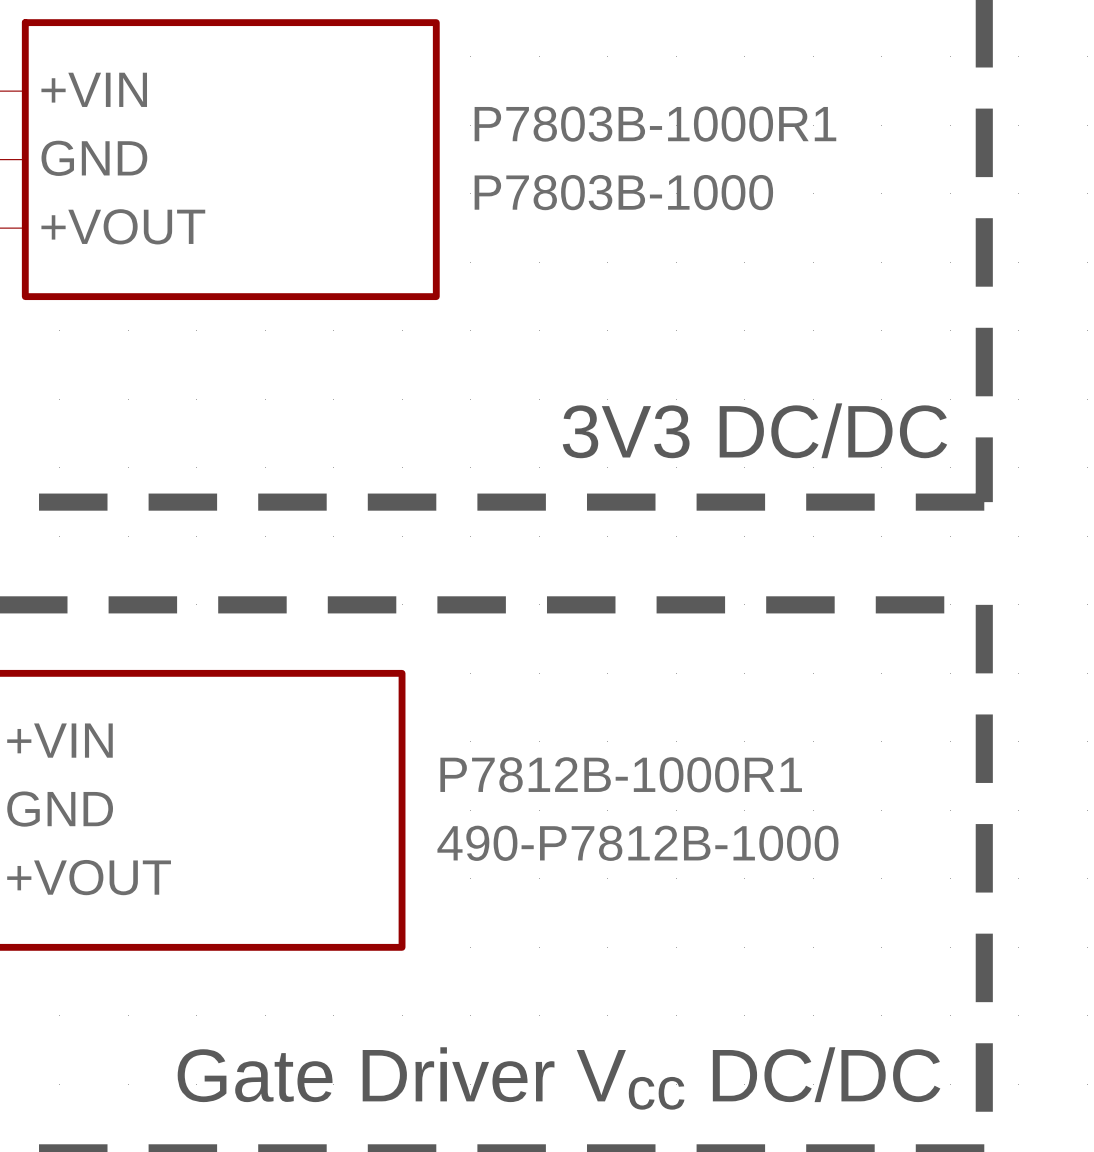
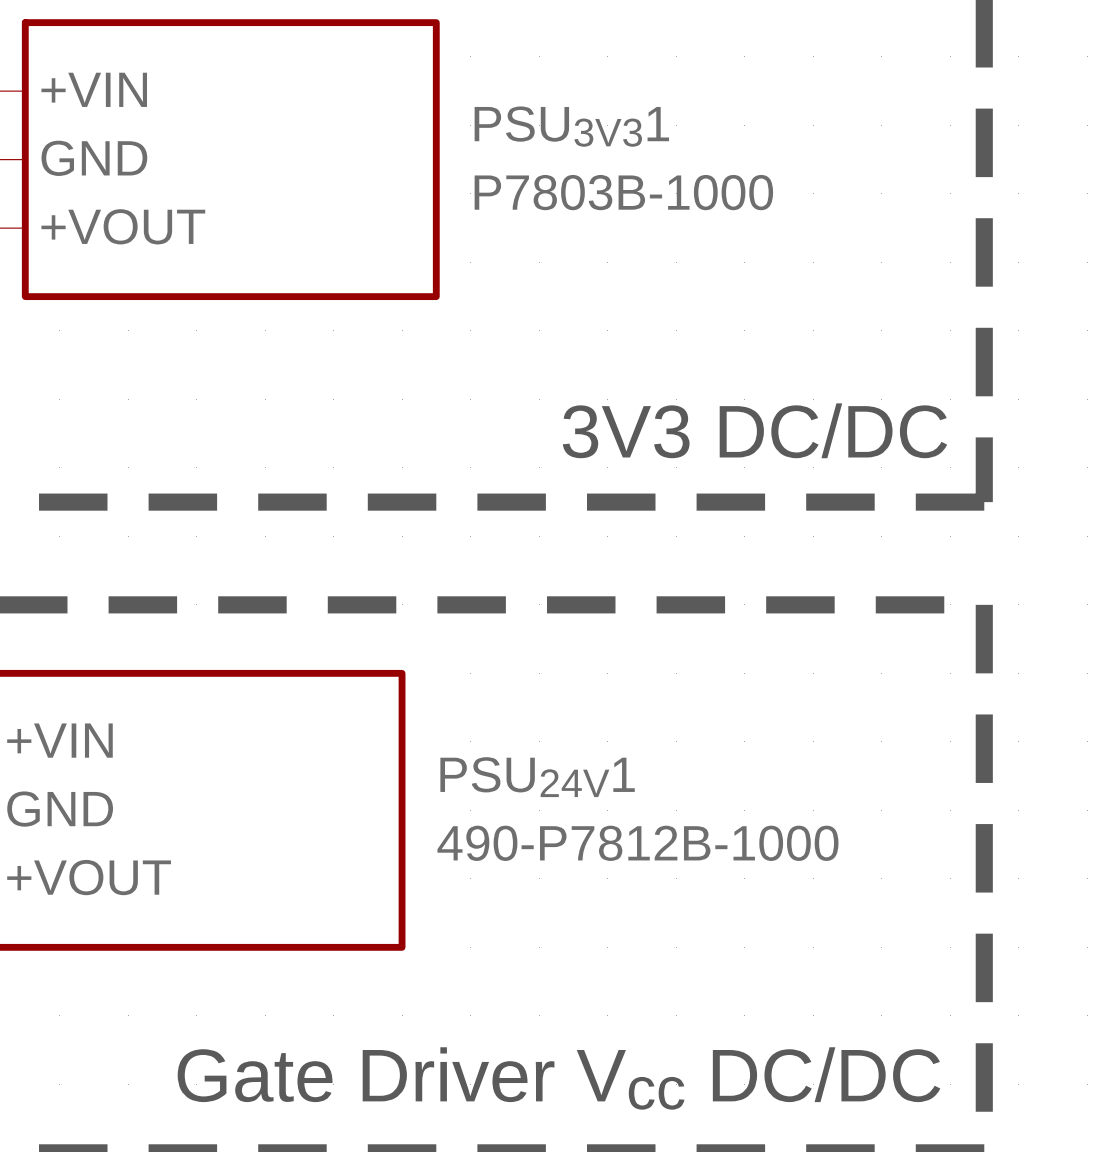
P7803B-1000R1 name: P7803B-1000R1 (655, 124) -> PSU3V31 (571, 126)
P7812B-1000R1 name: P7812B-1000R1 (621, 774) -> PSU24V1 (537, 777)

